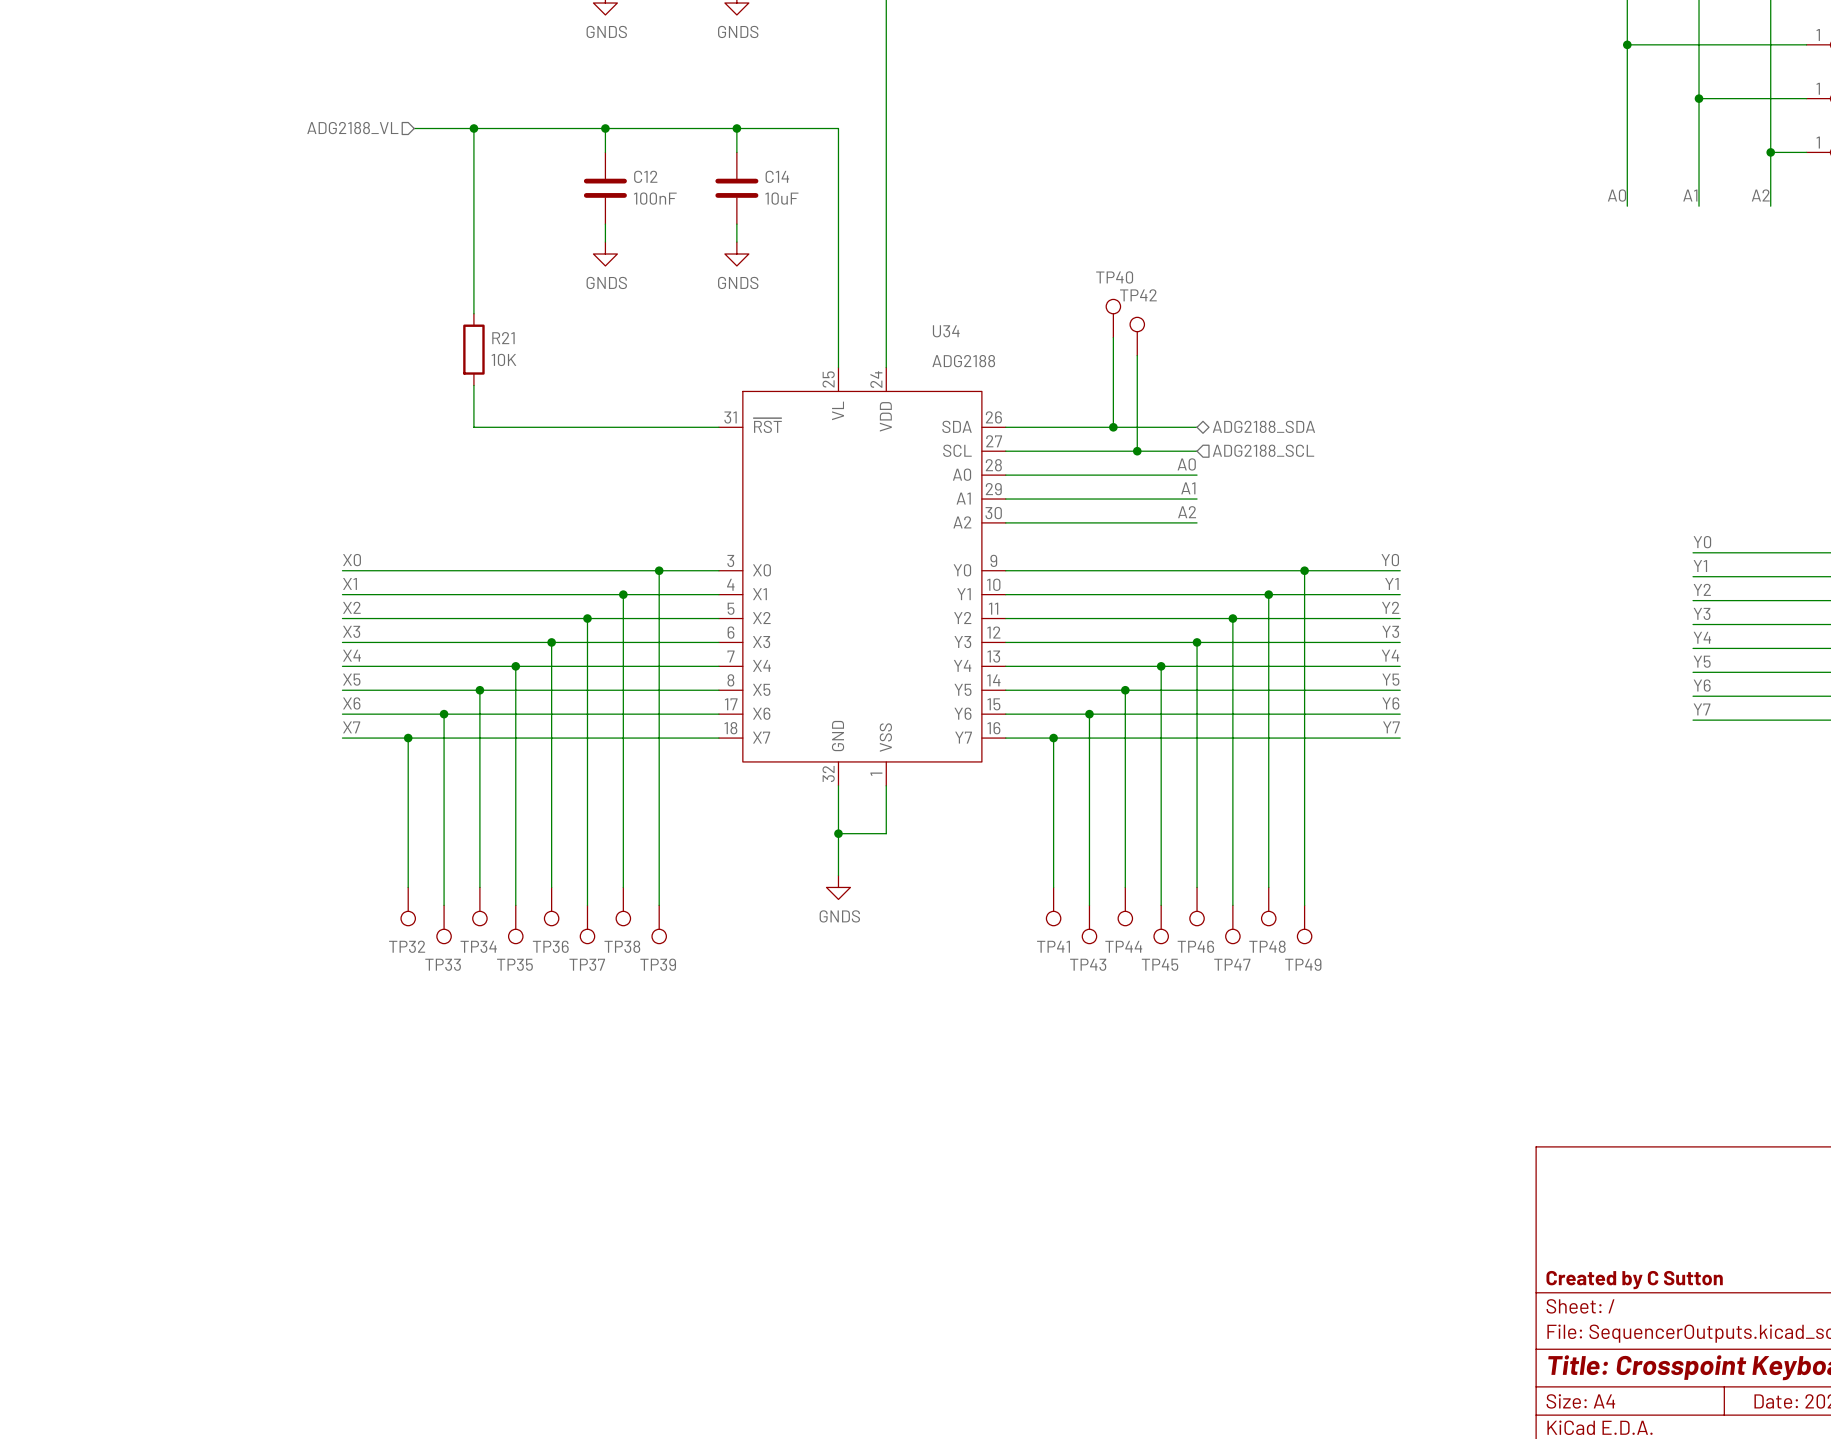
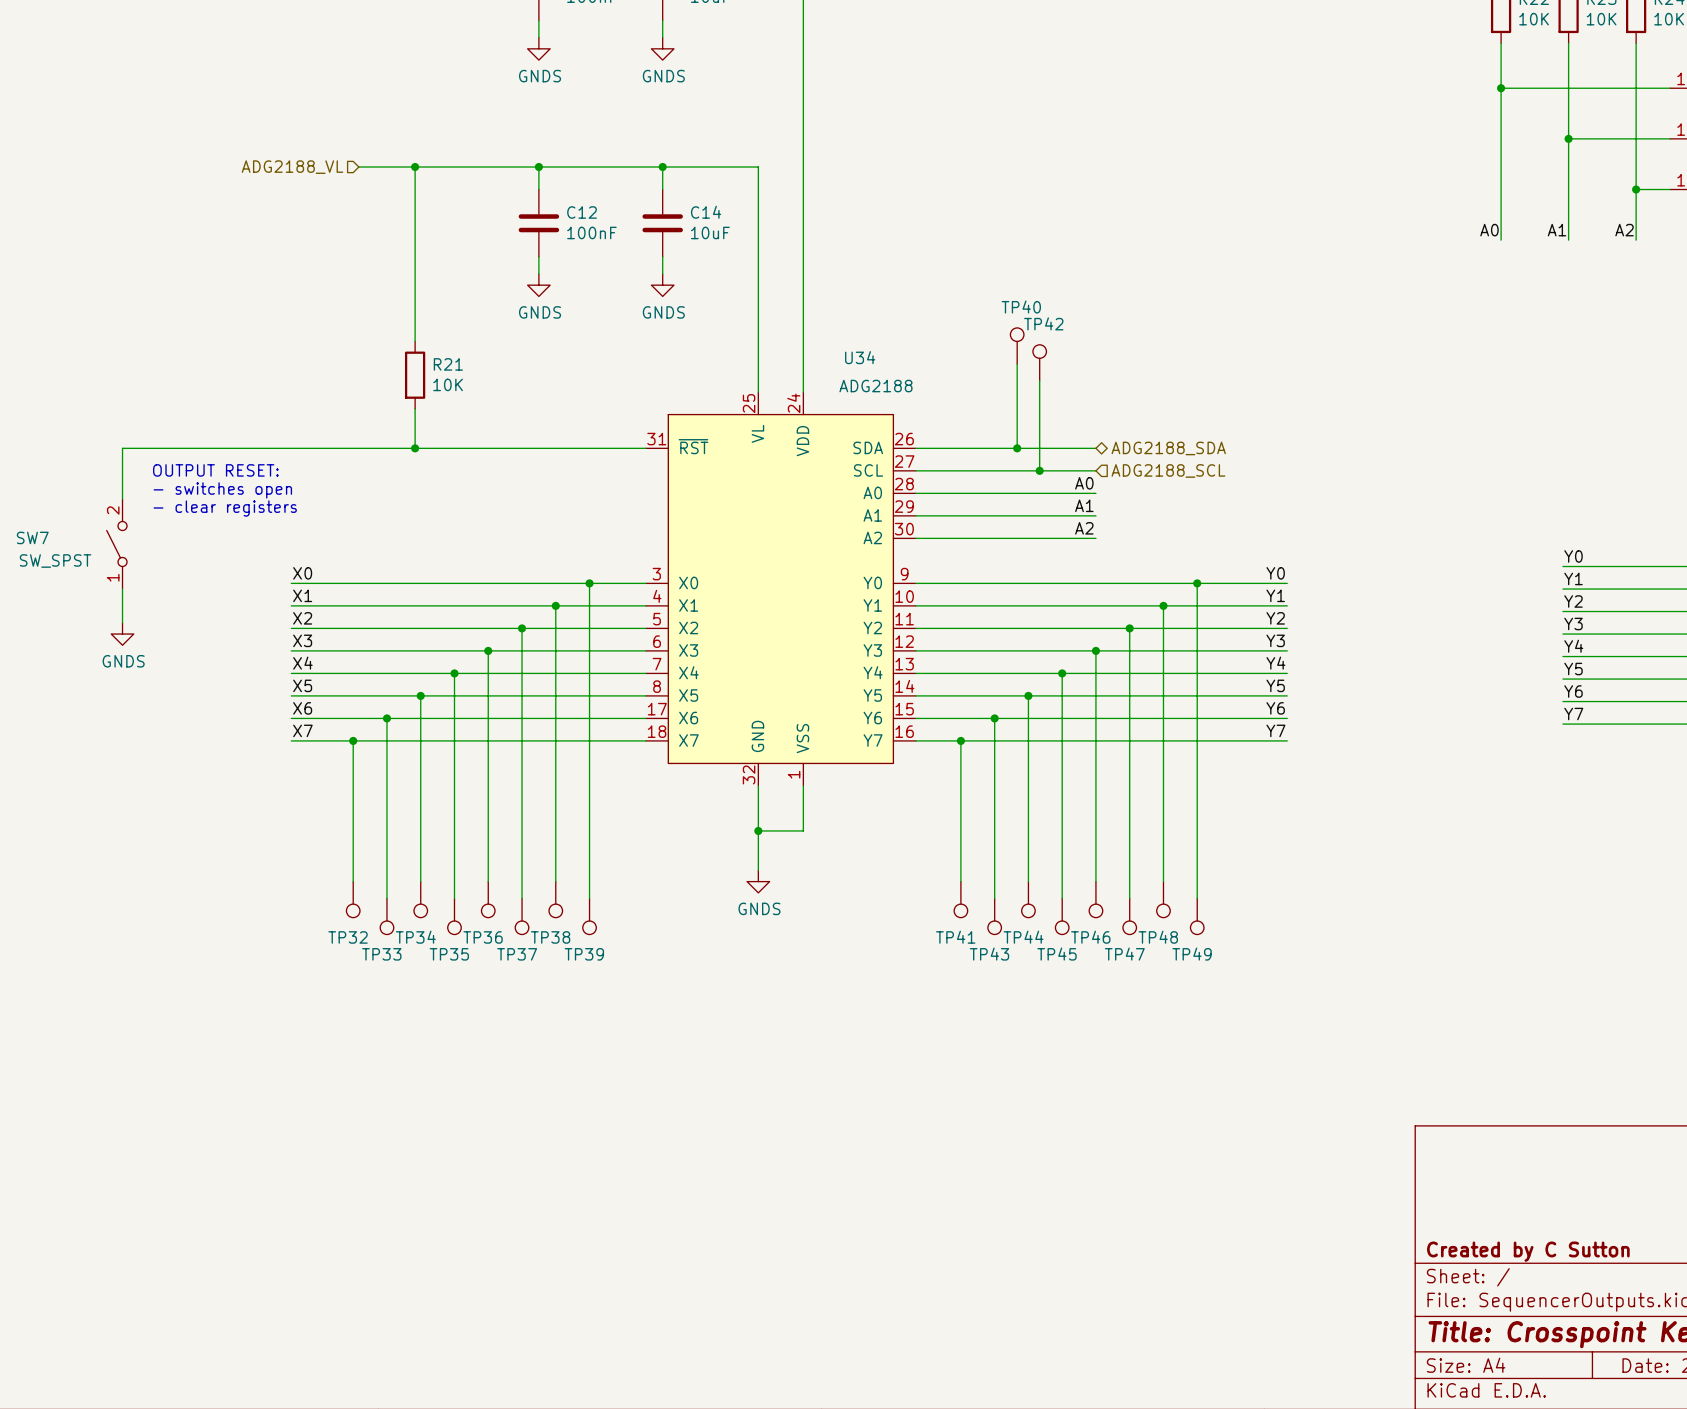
wire: none -> (415, 448) (122, 448) (122, 498)
junction: none -> (415, 448)
text: none -> OUTPUT RESET: (215, 470)
text: none -> - switches open (222, 490)
text: none -> - clear registers (225, 508)
SW7: none -> SW_SPST (116, 544)
wire: none -> (122, 589) (122, 622)
power symbol: none -> GNDS (122, 634)

